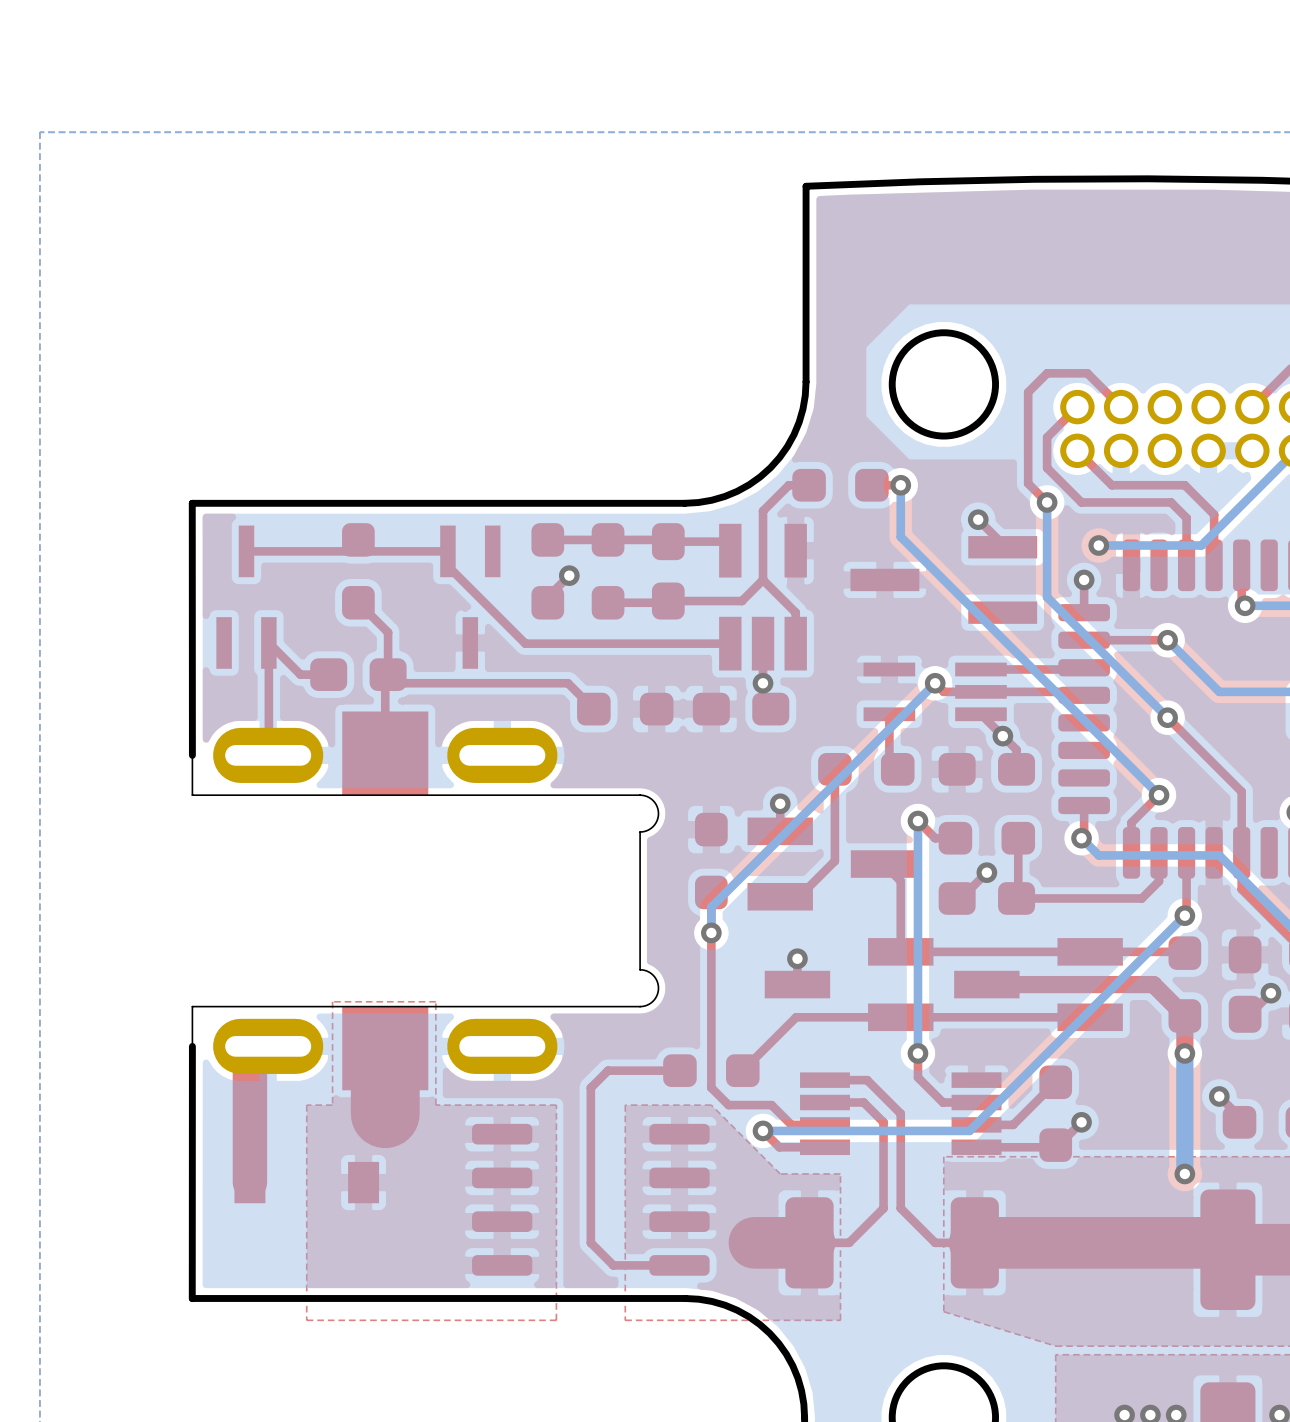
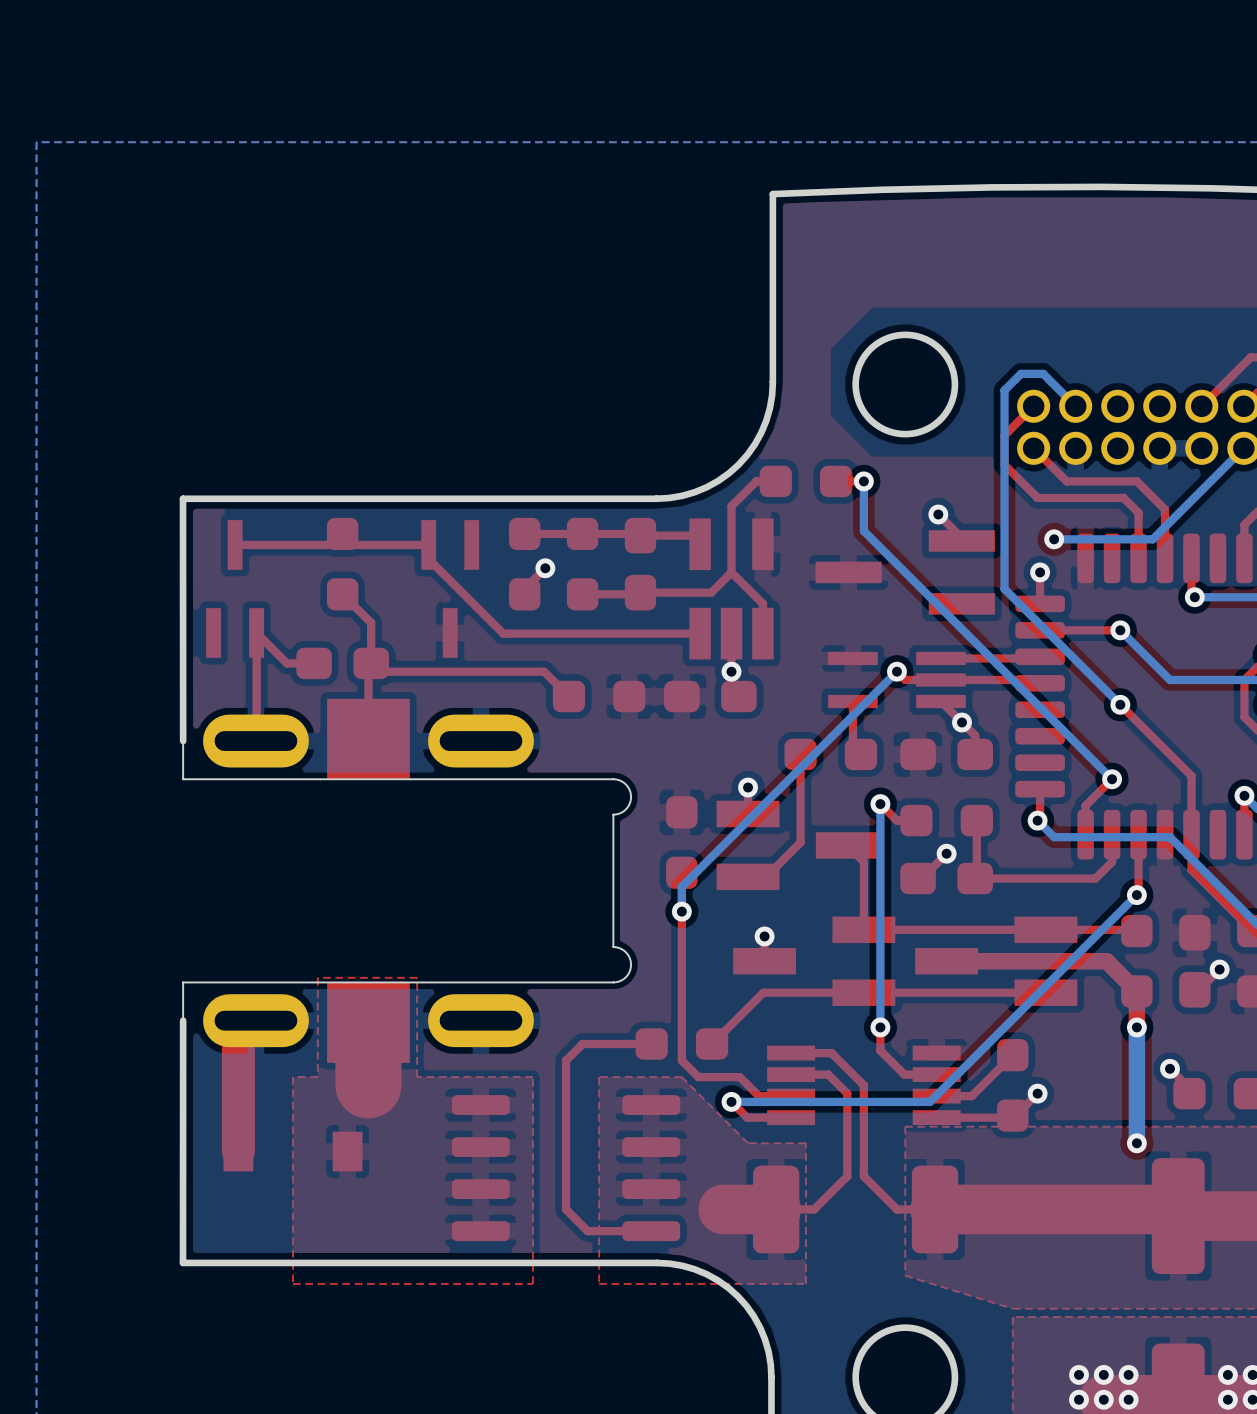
bottom track: none -> (1075, 406) (1043, 373) (1021, 373) (1004, 390) (1004, 497)
top track: (1121, 407) (1087, 373) (1047, 373) (1028, 392) (1028, 483) (1047, 502) -> none
via: (1047, 502) -> none

